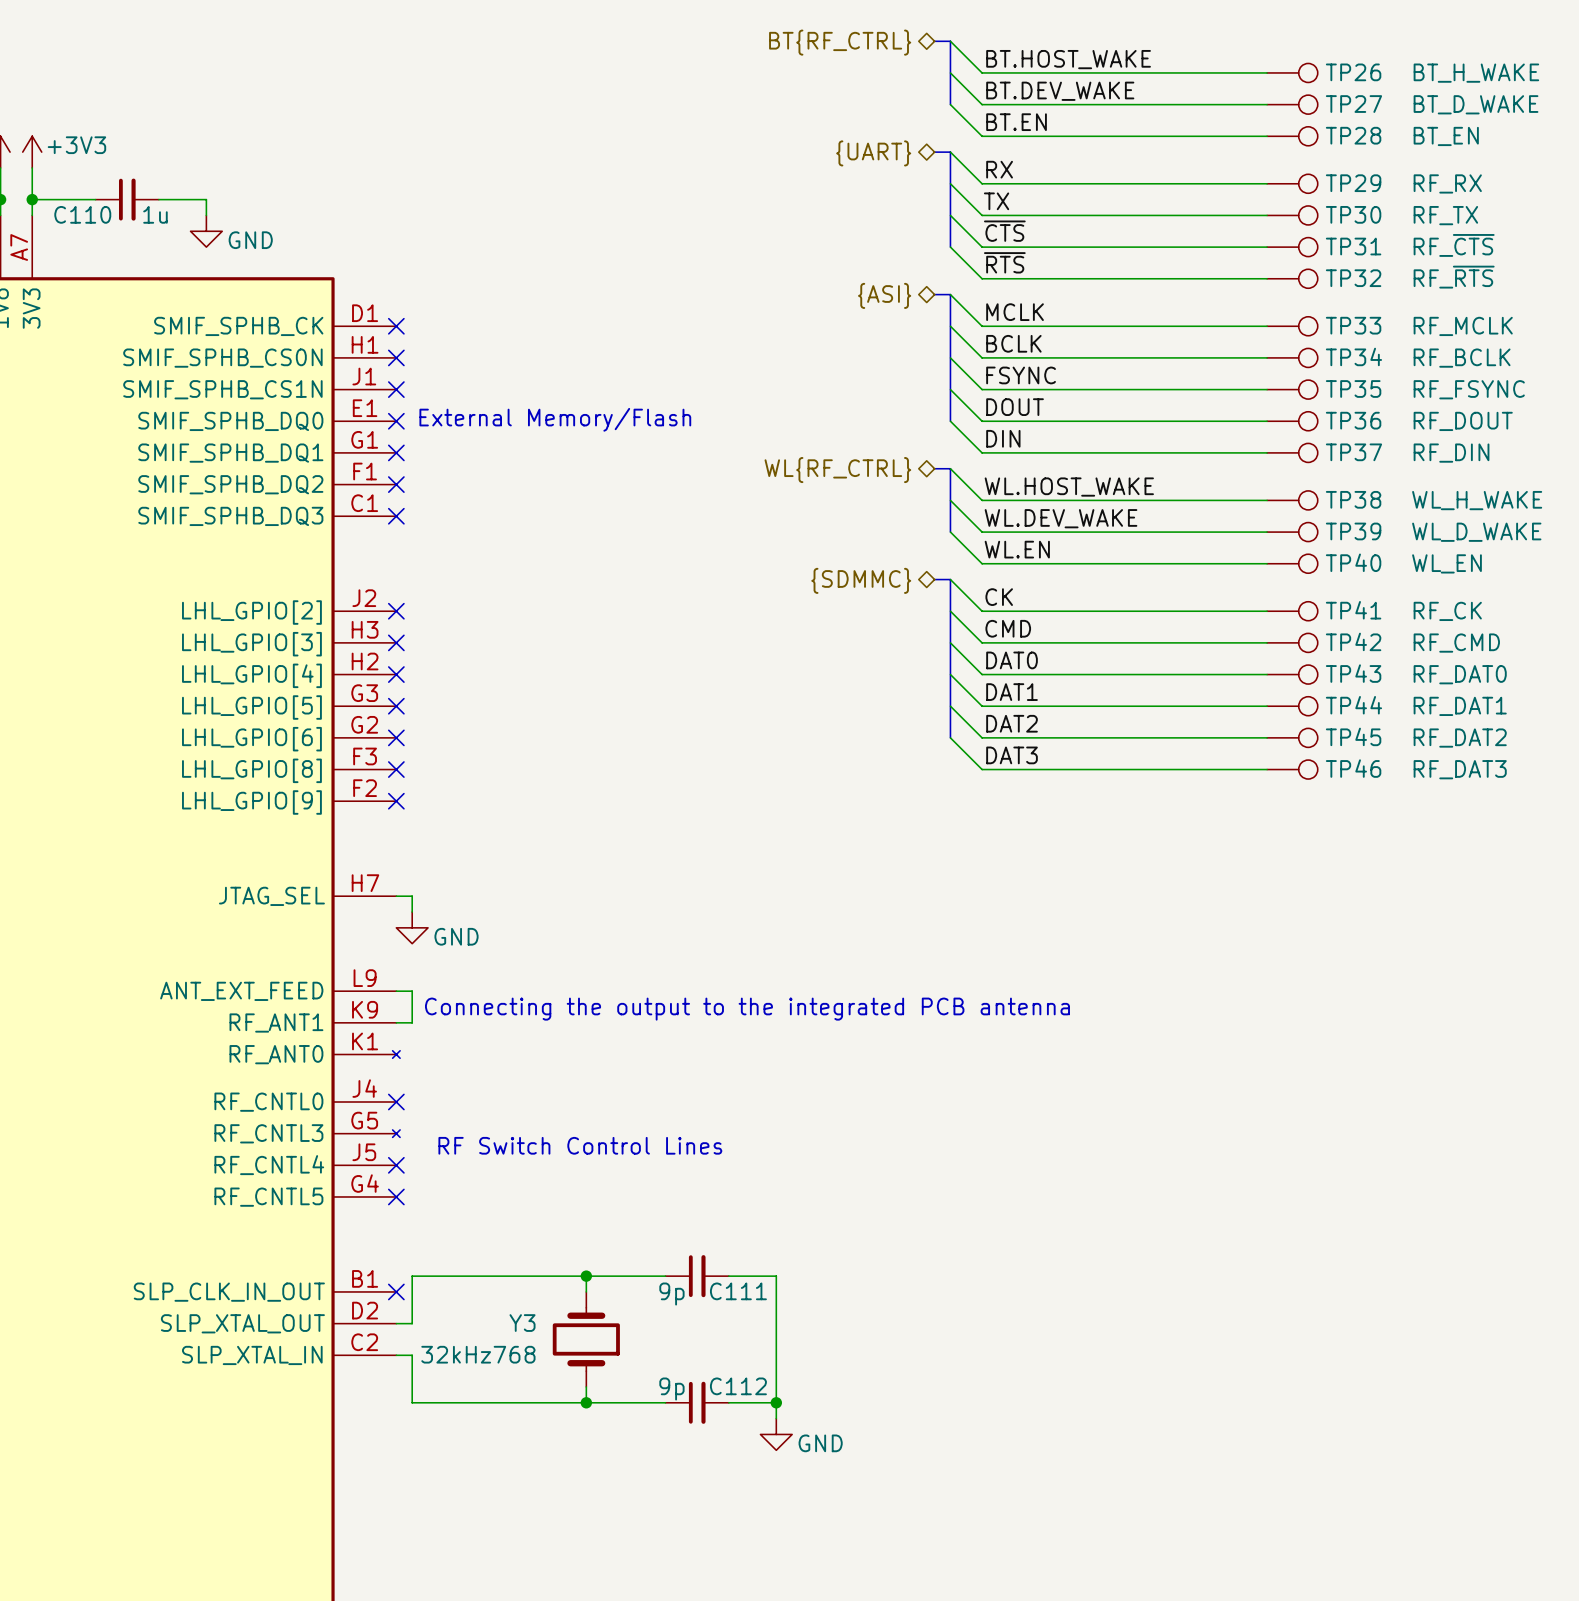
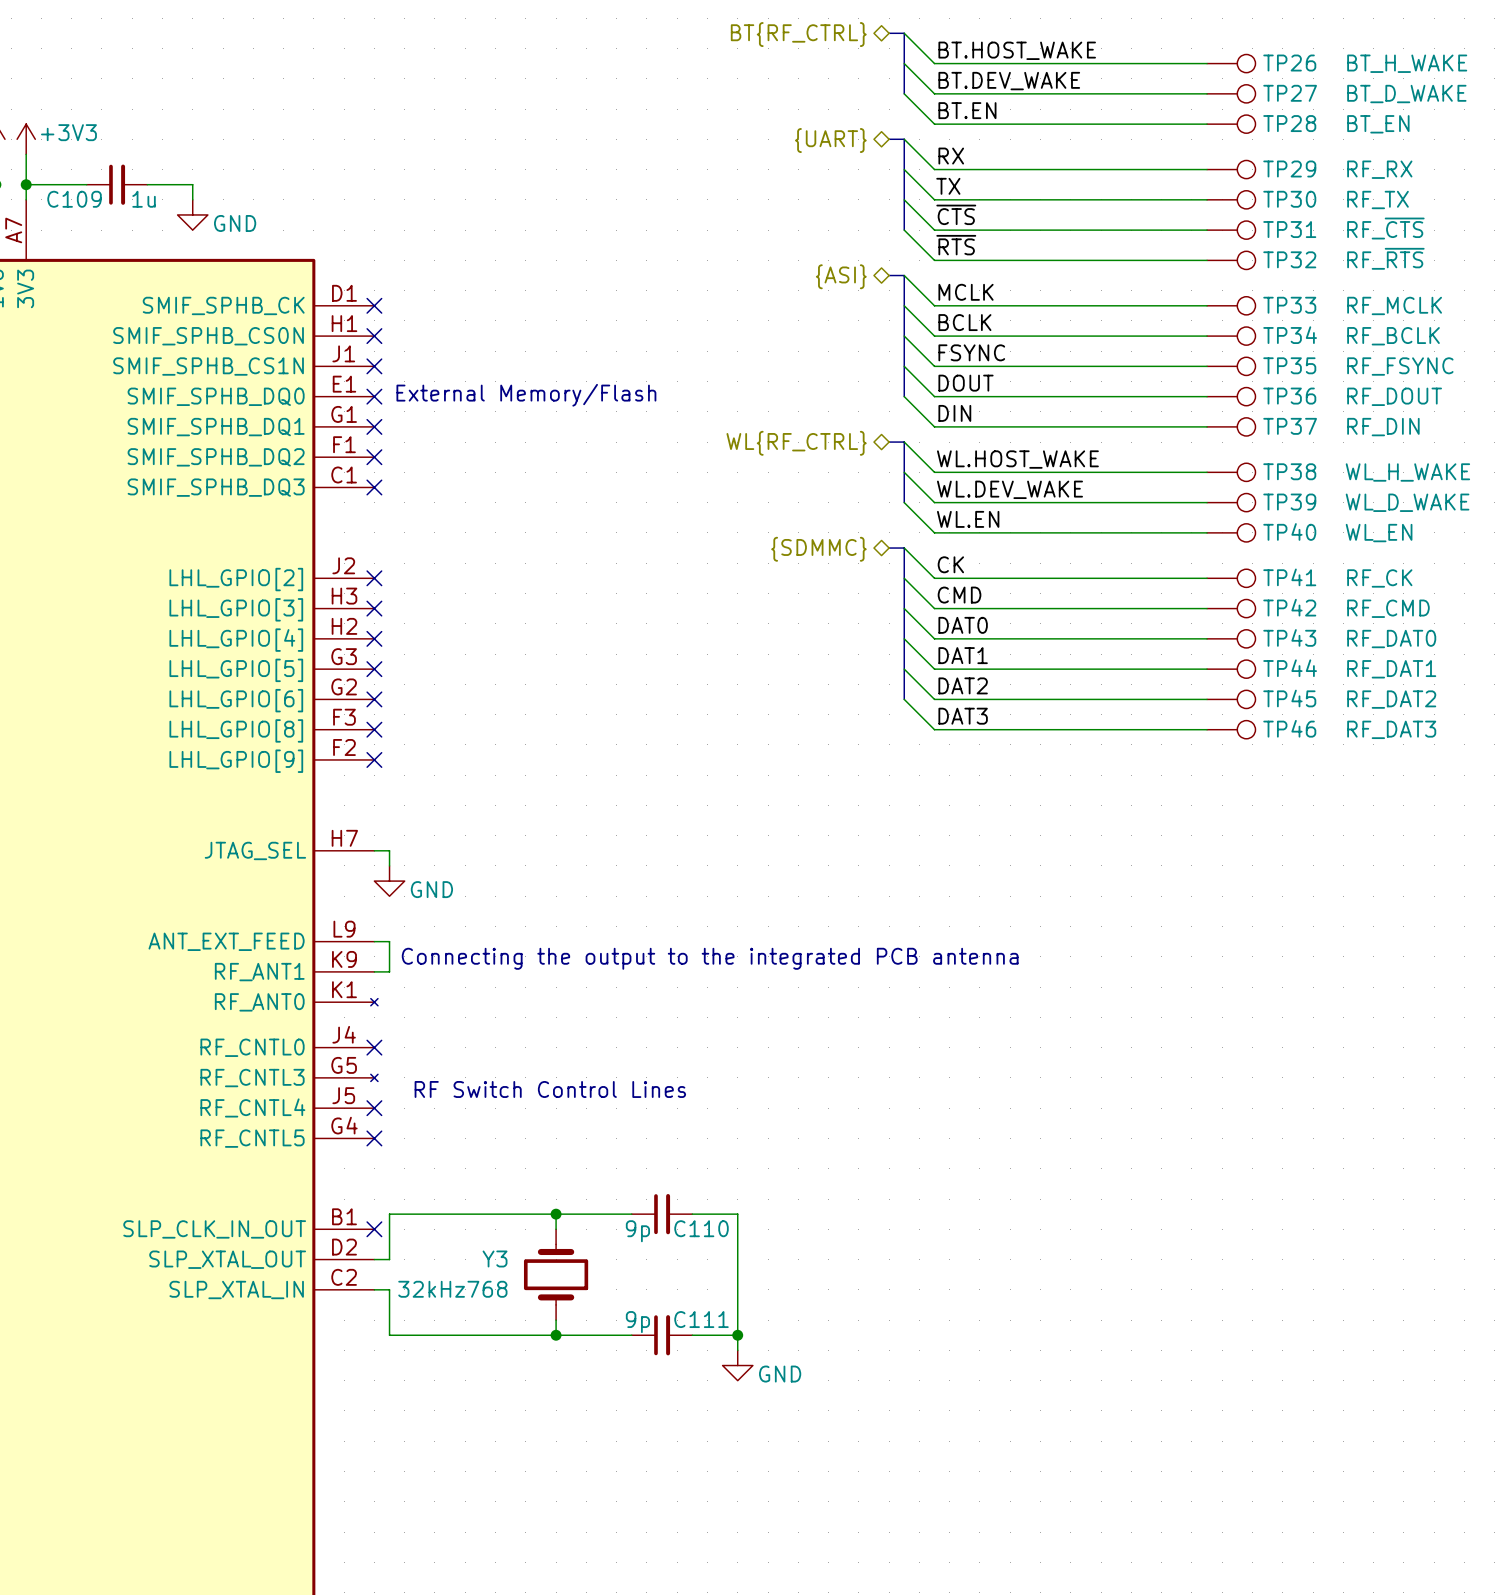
C110 name: C110 (82, 214) -> C109 (74, 199)
C111 name: C111 (738, 1291) -> C110 (701, 1228)
C112 name: C112 (738, 1386) -> C111 (701, 1319)

